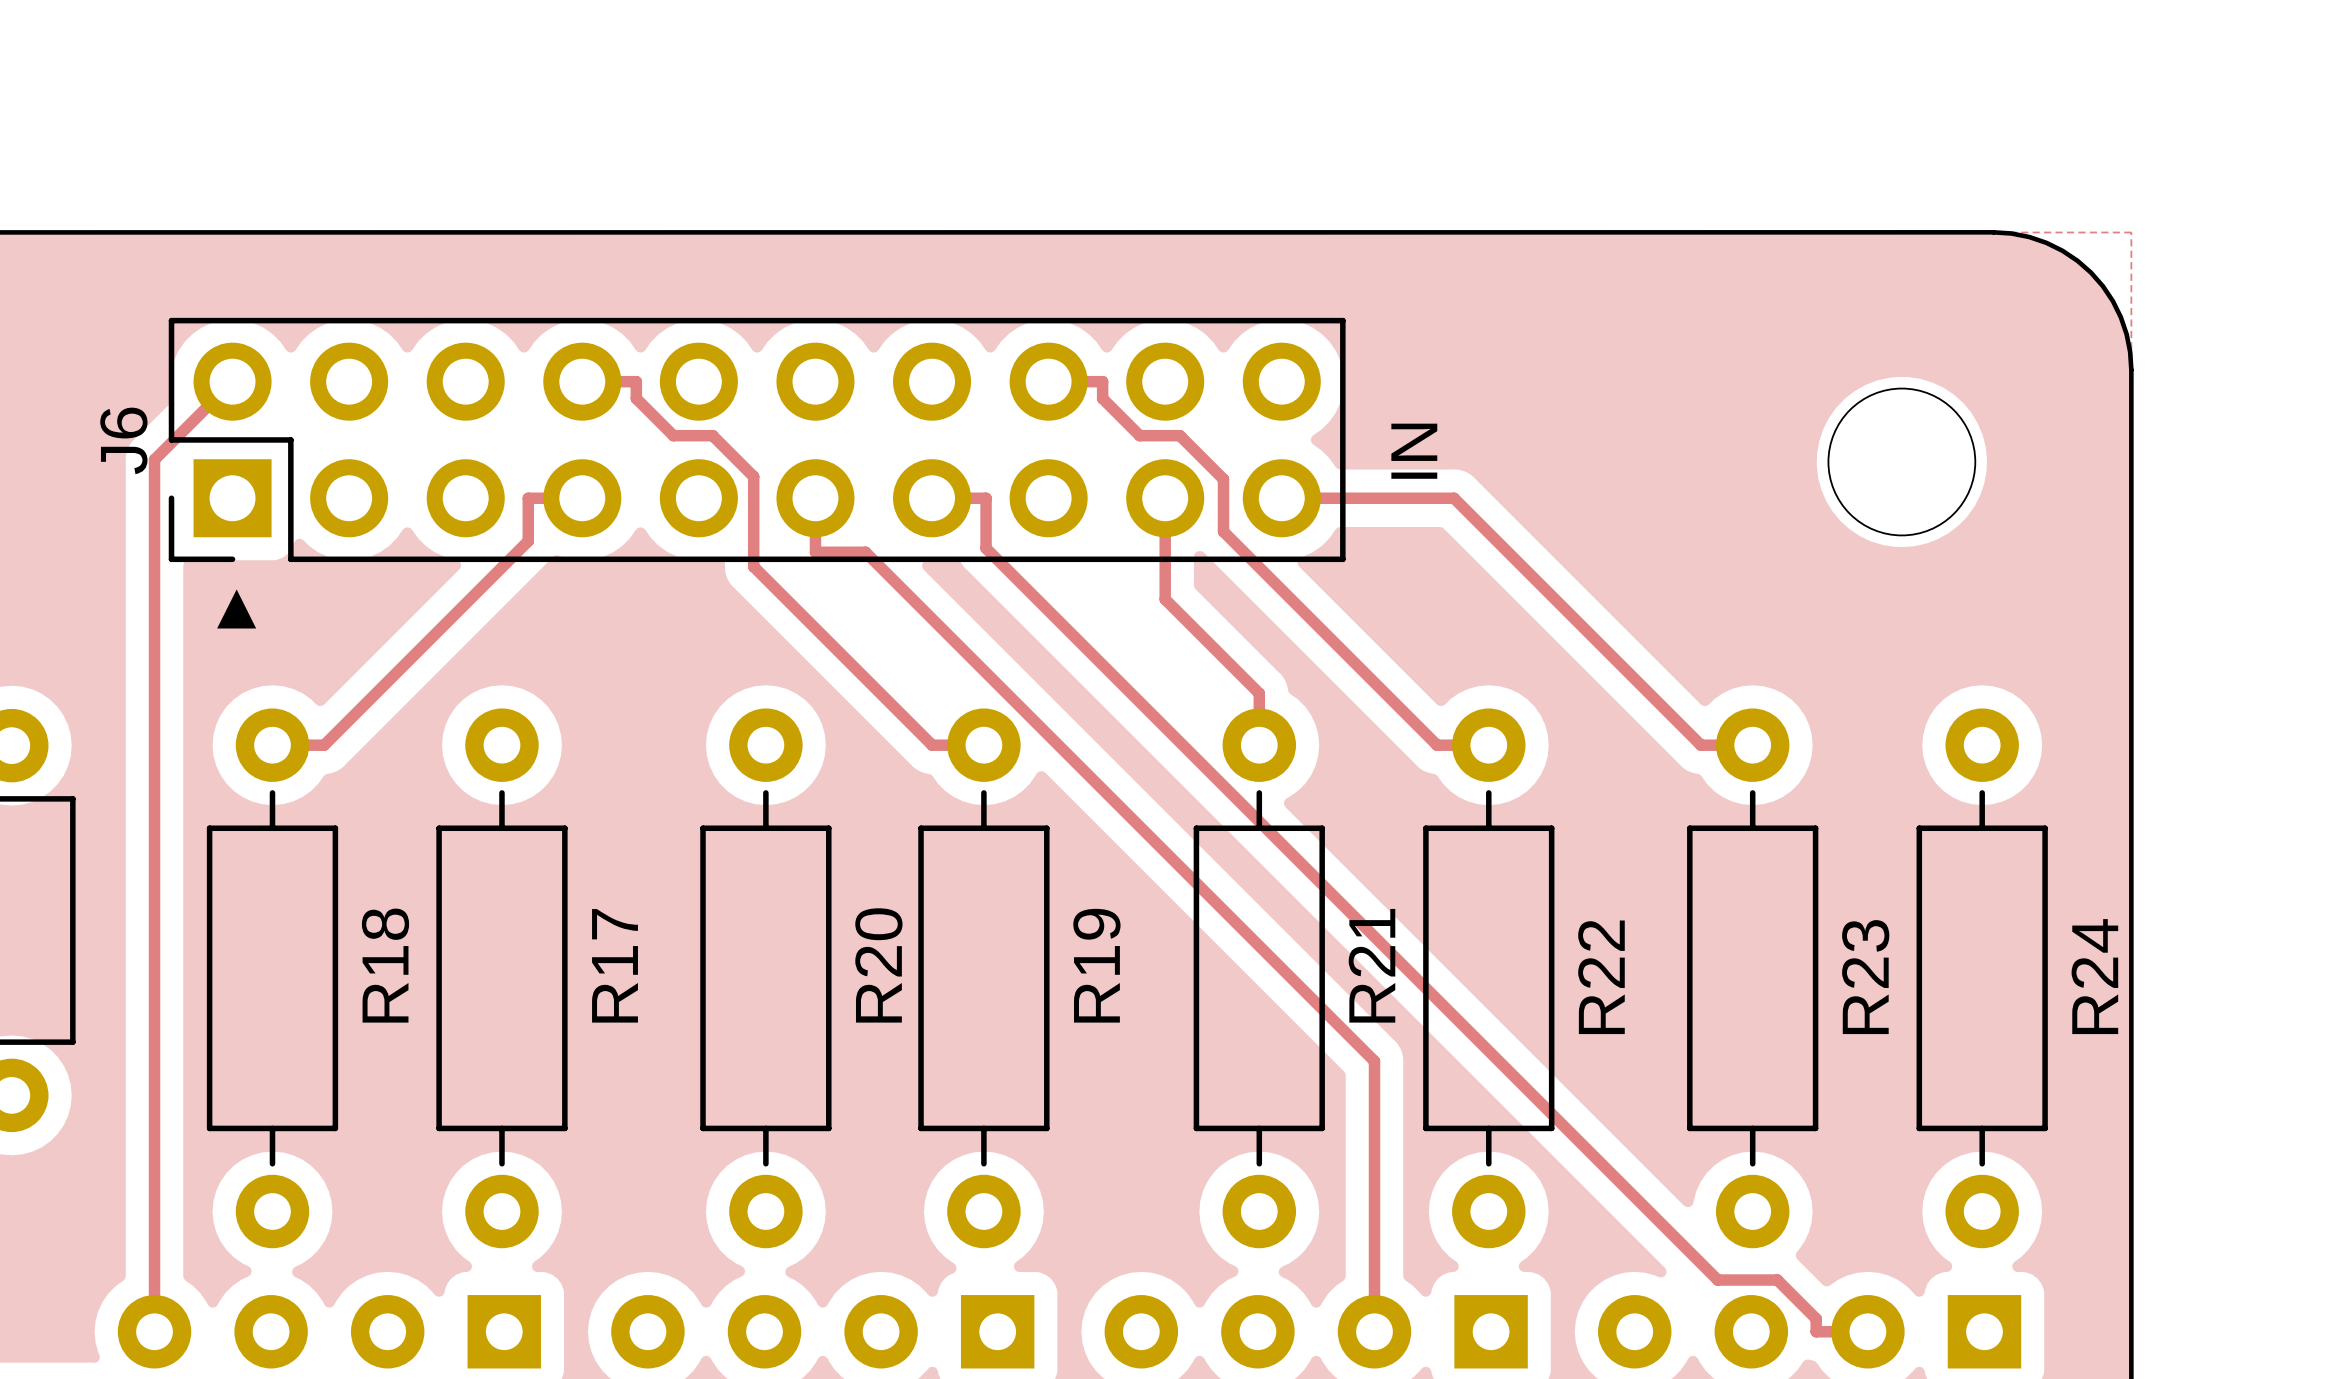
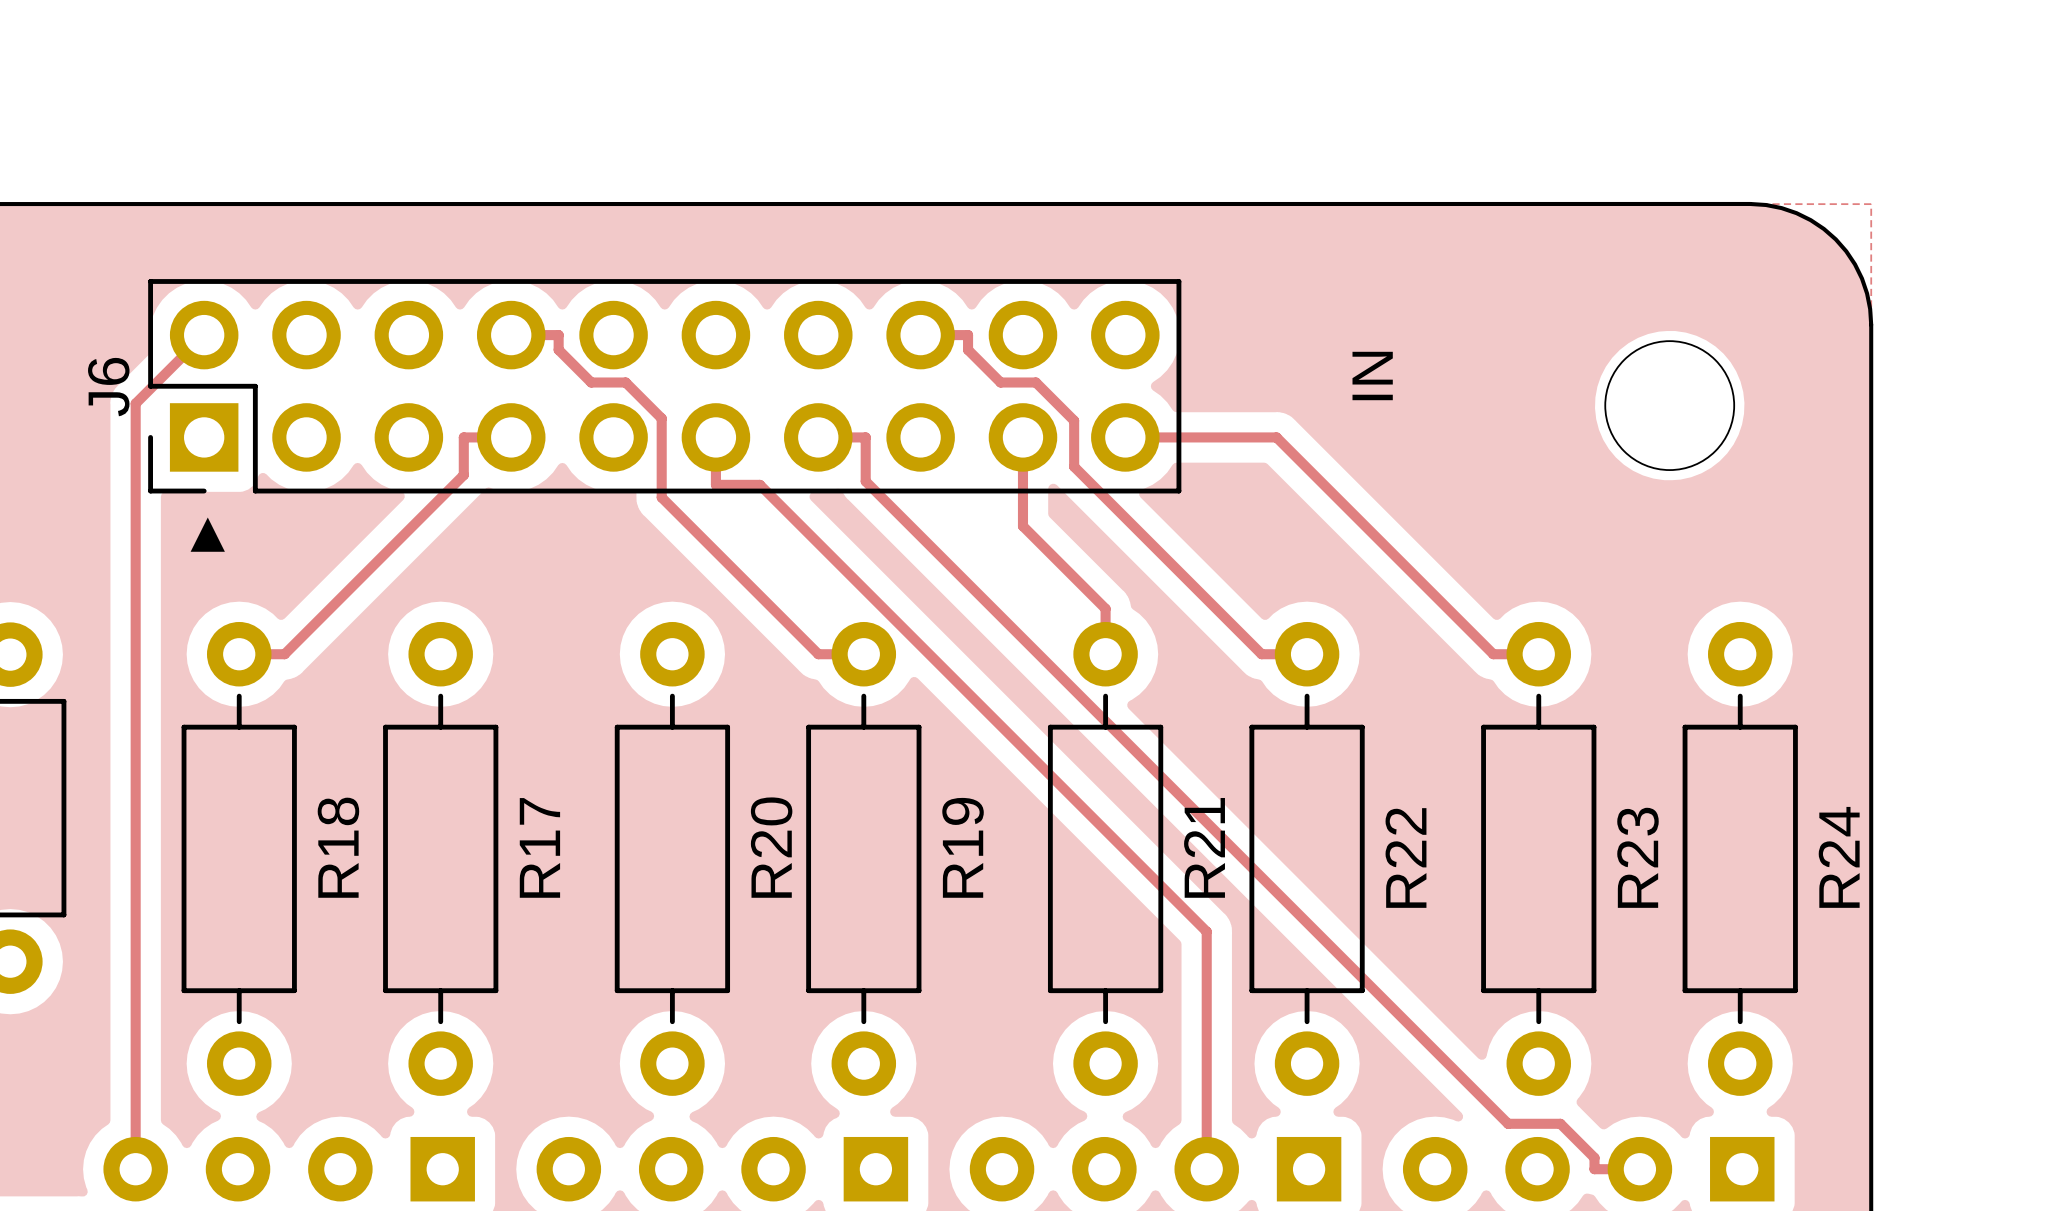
text position: IN (1414, 451) -> IN (1372, 376)

